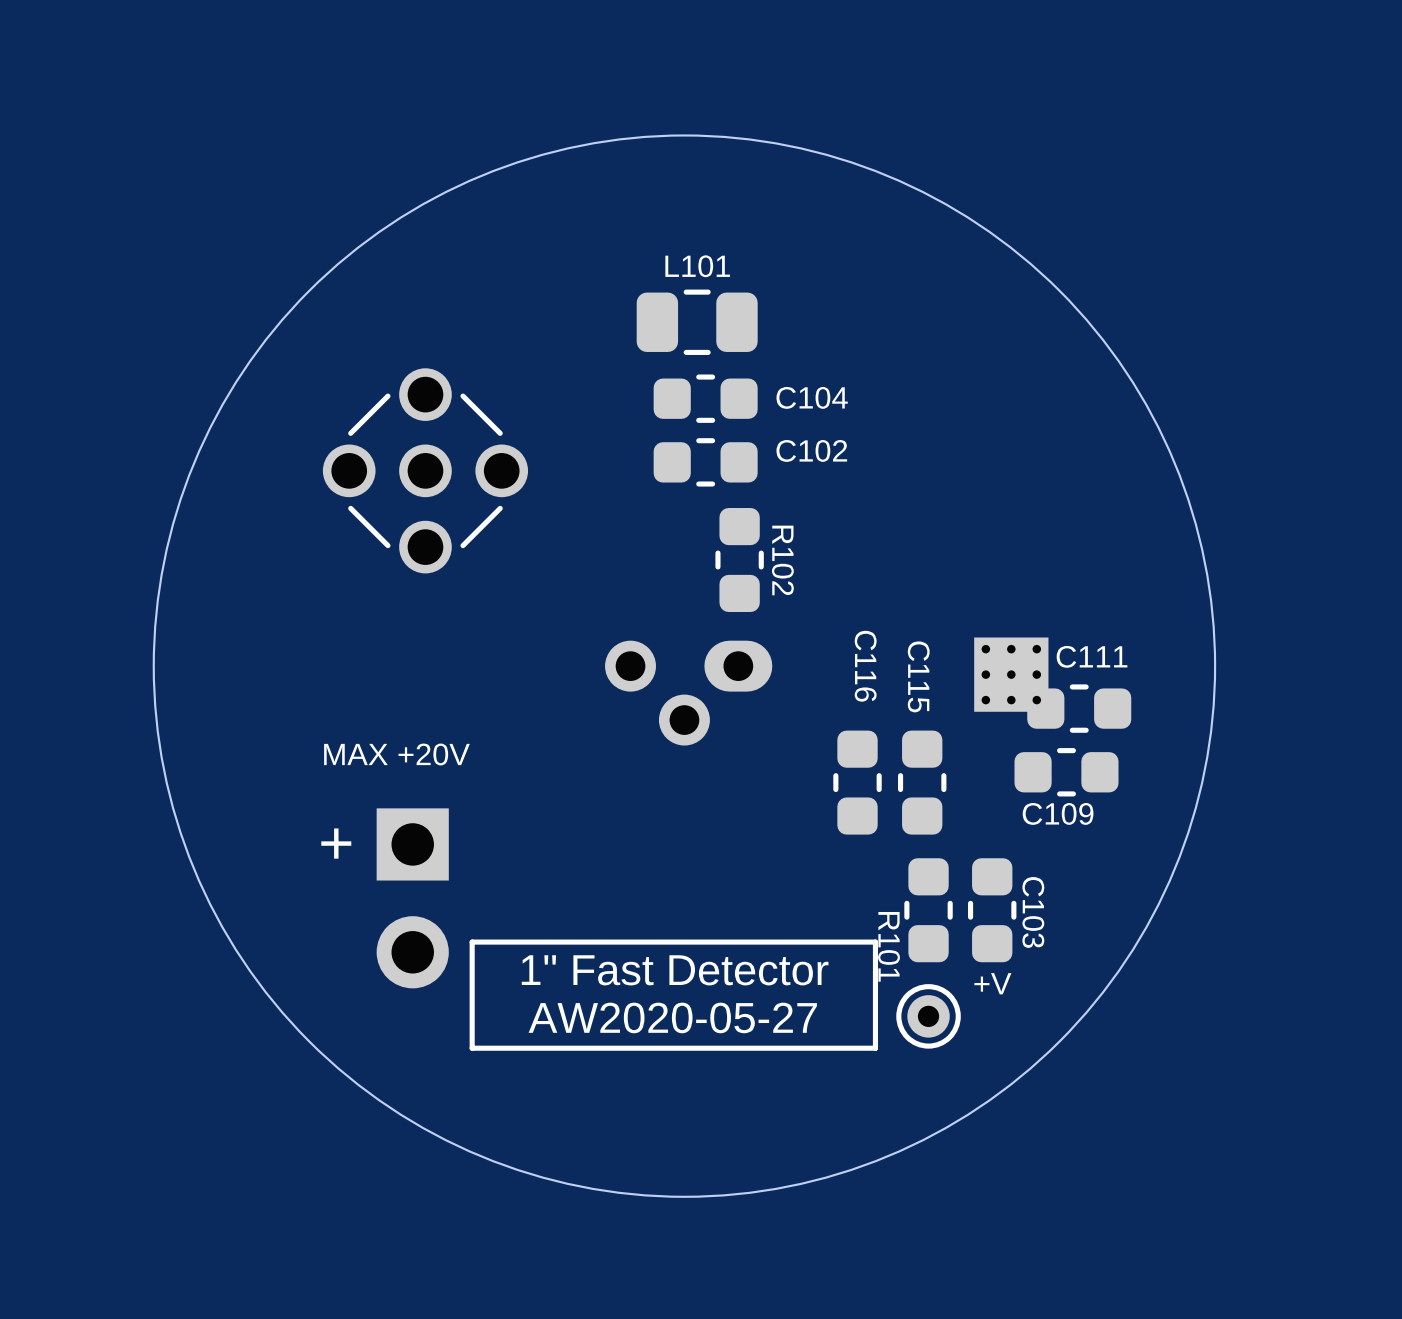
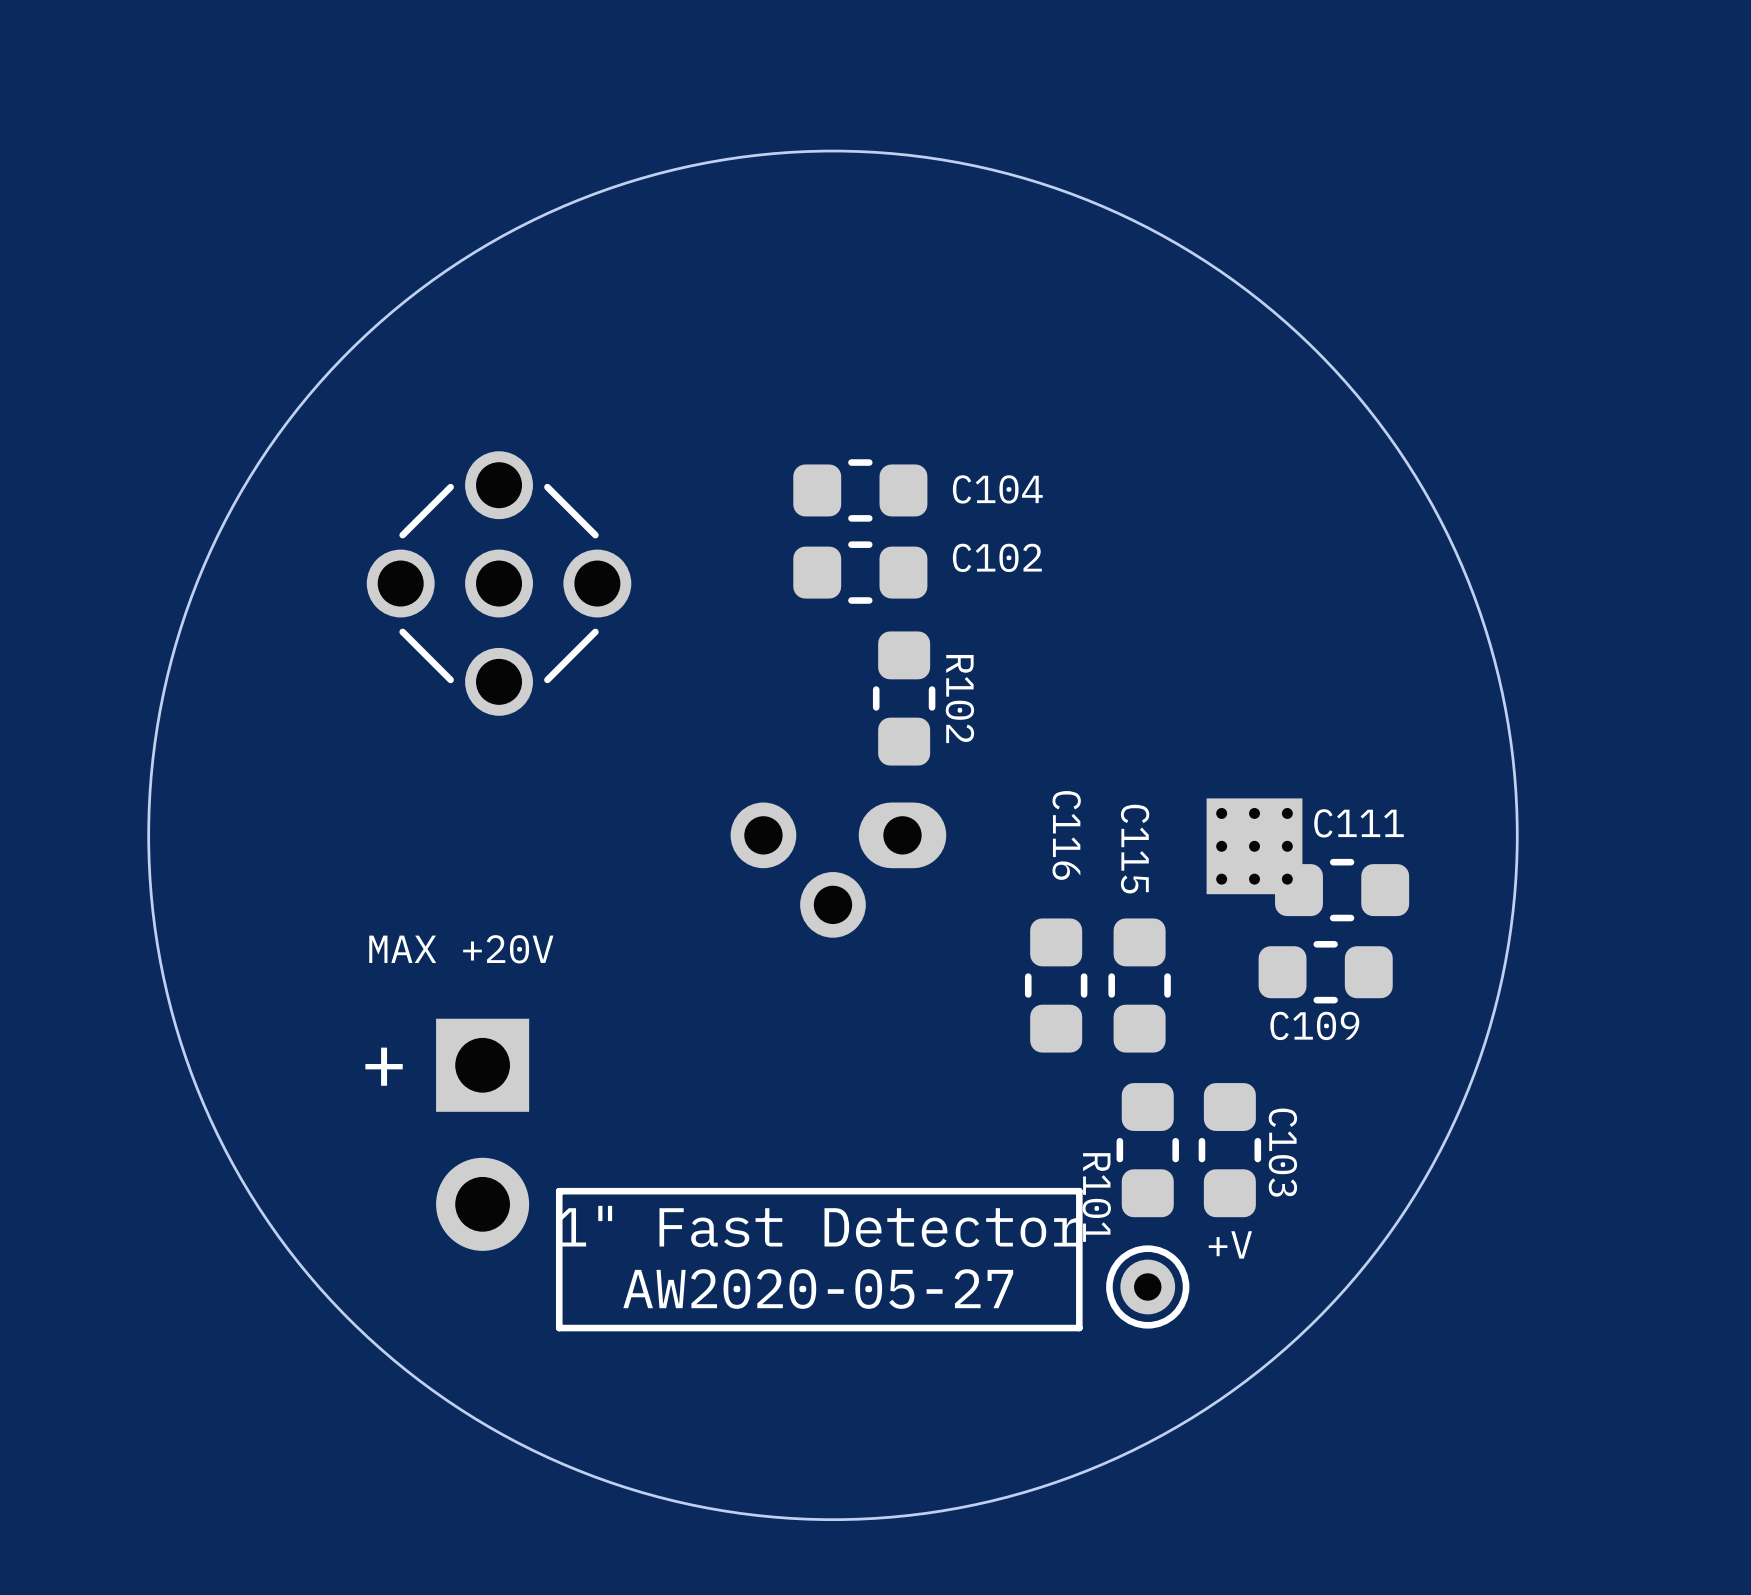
L101: (697, 322) -> none

